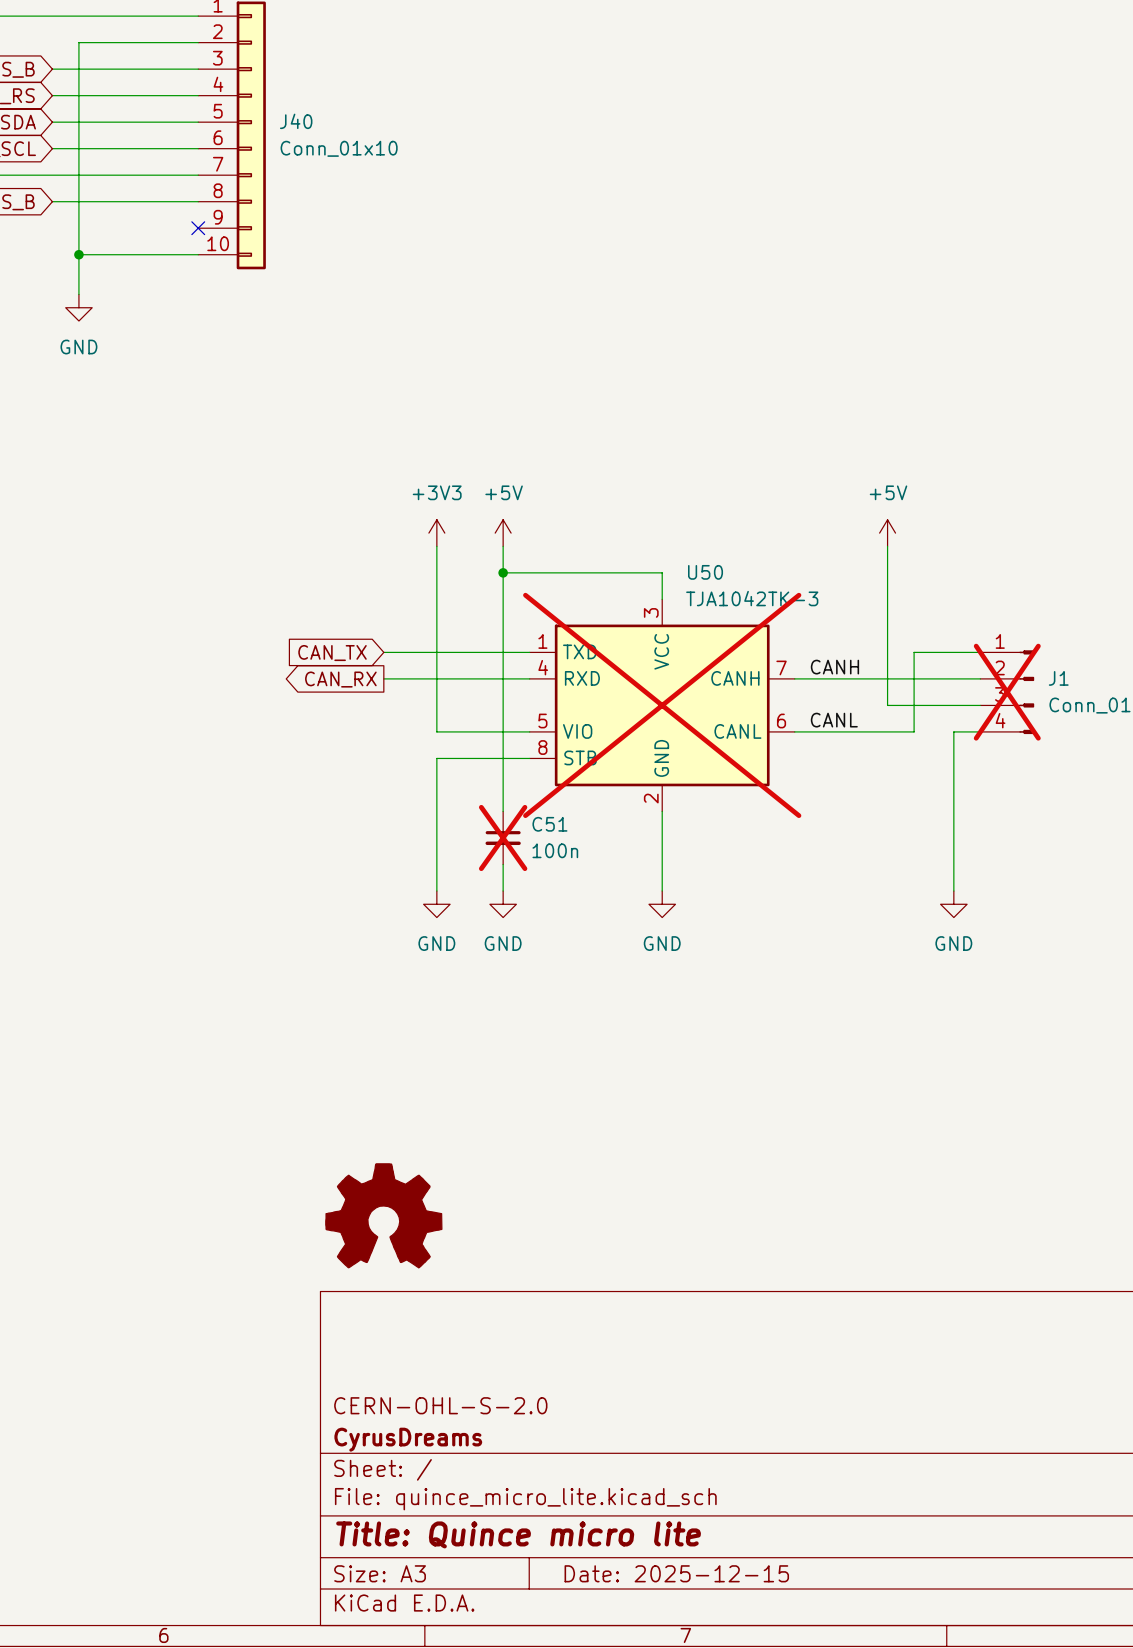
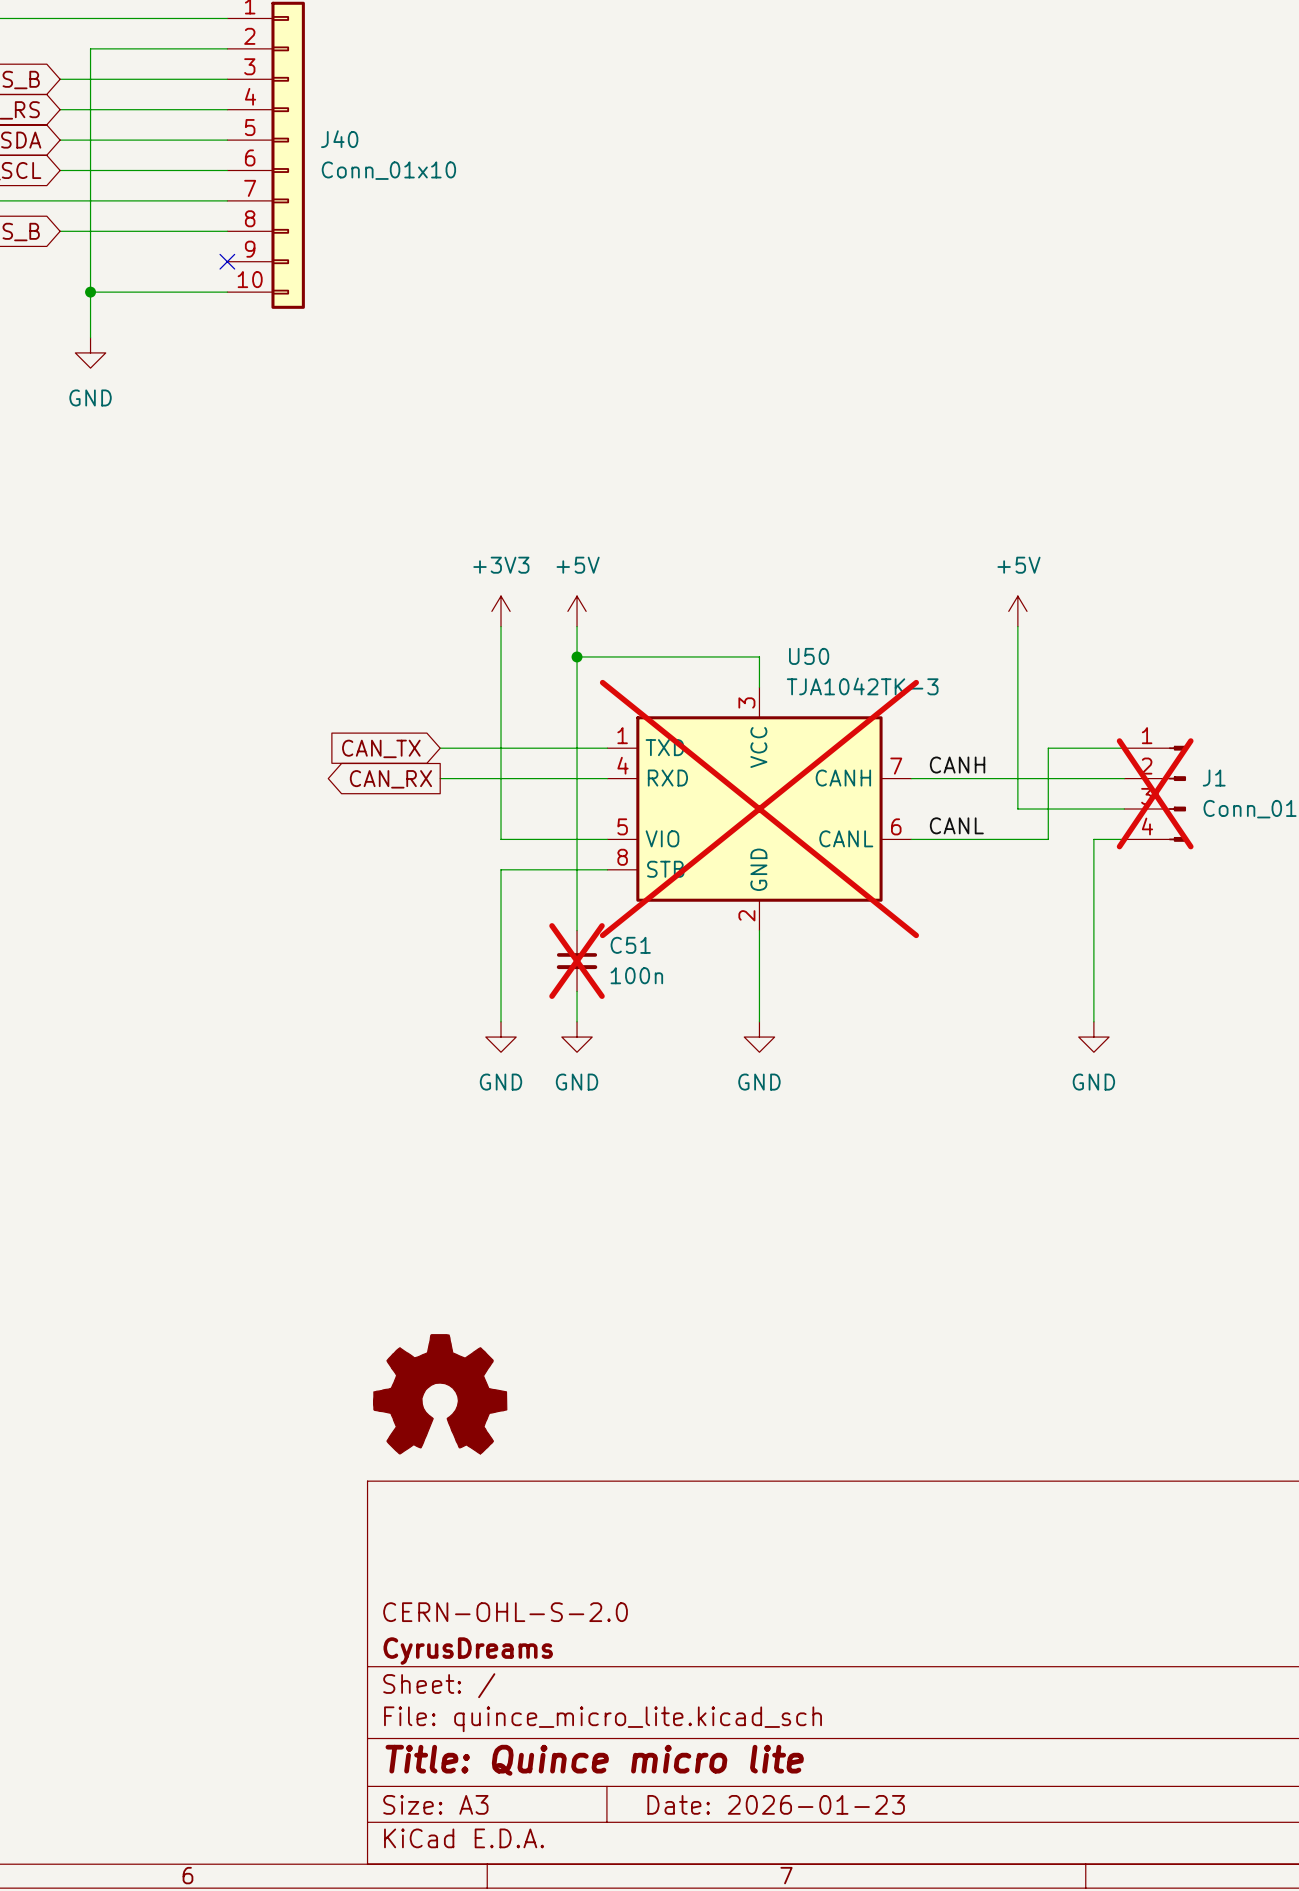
title block: Date: 2025-12-15 (676, 1573) -> Date: 2026-01-23 (776, 1804)

